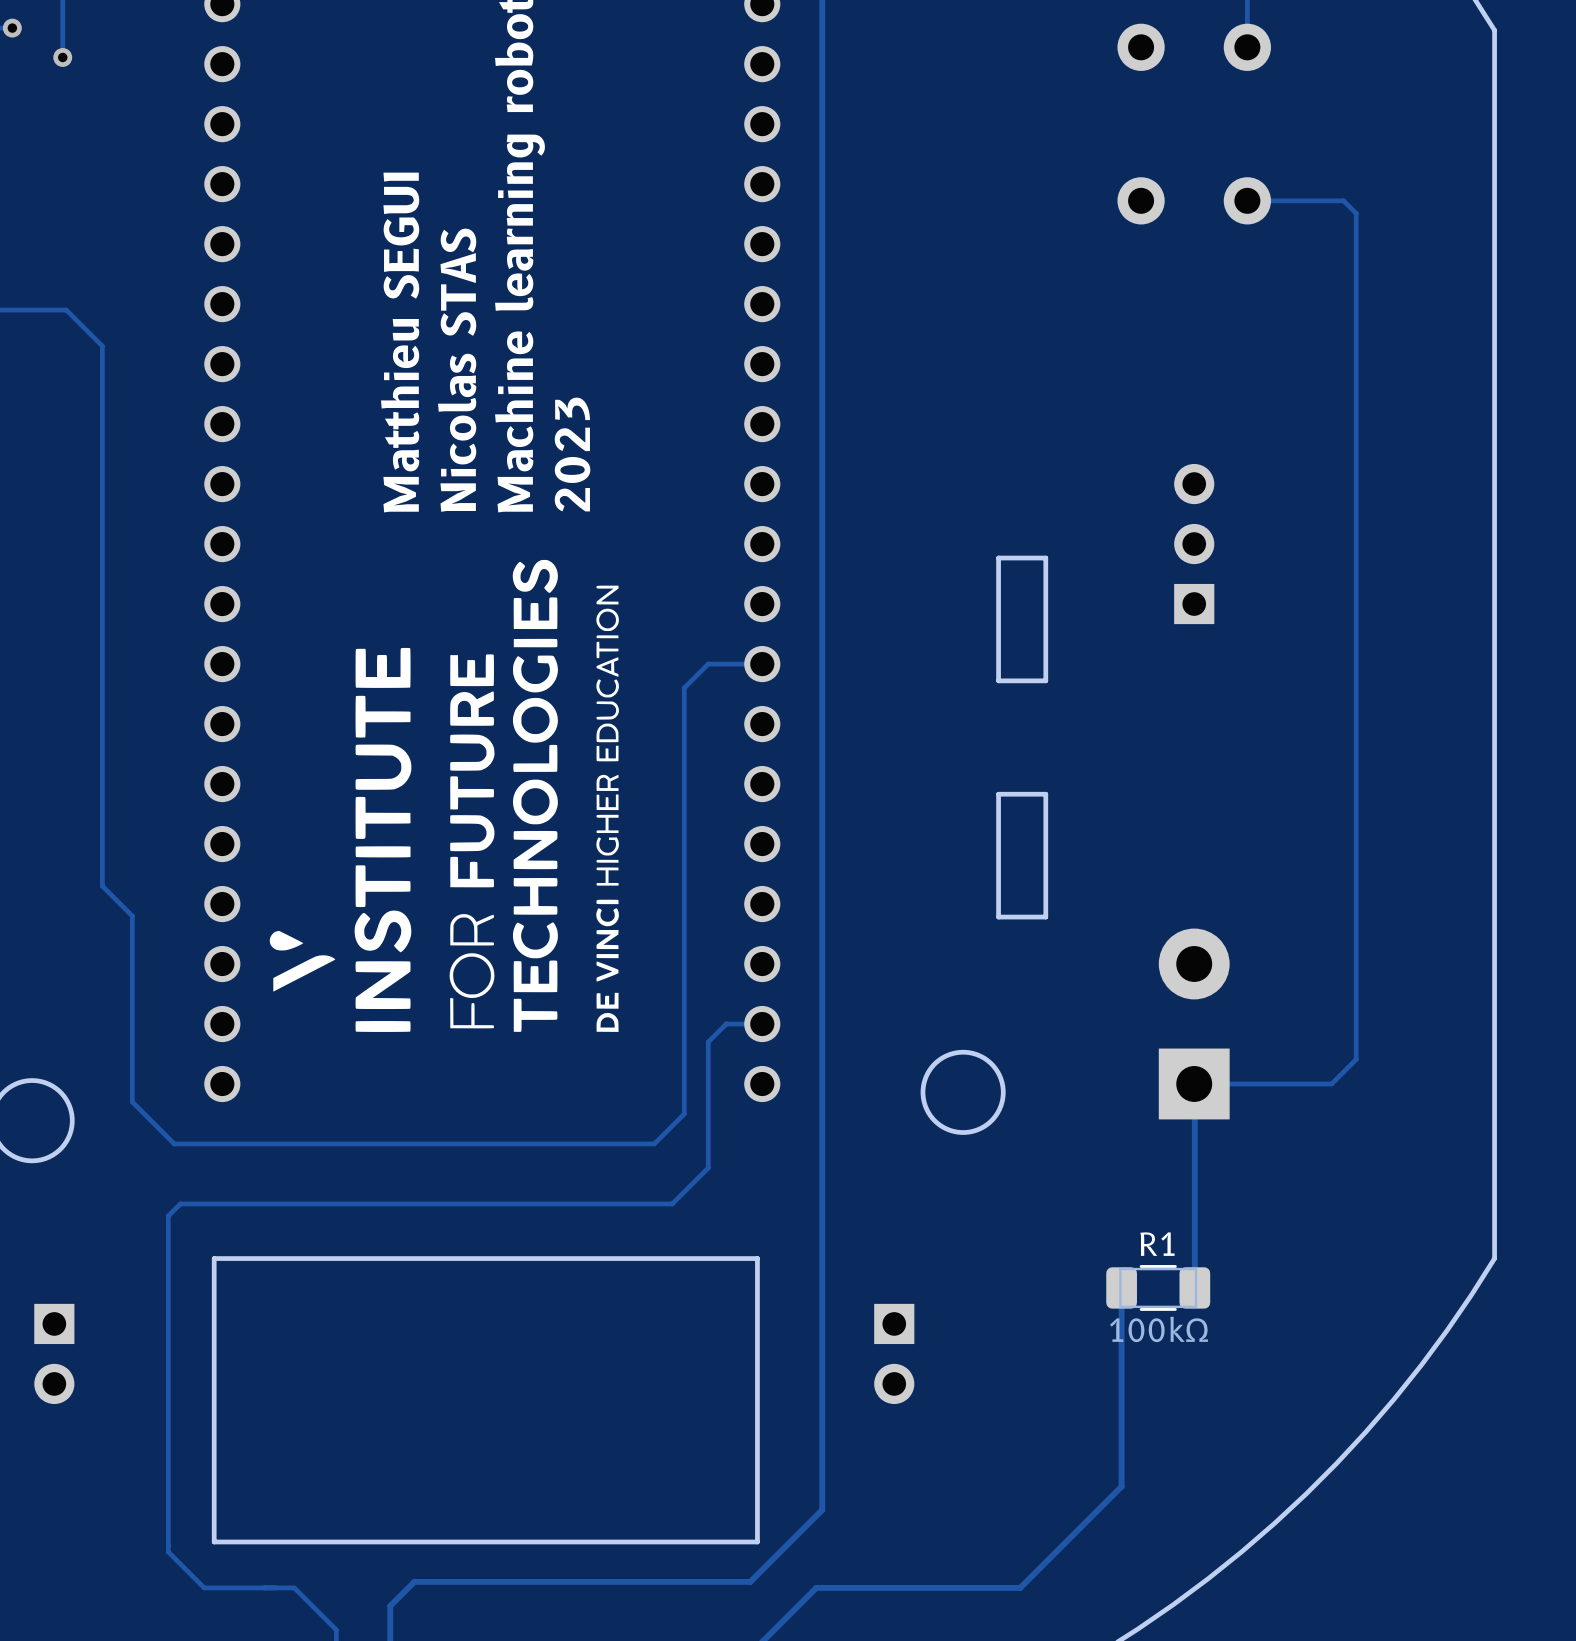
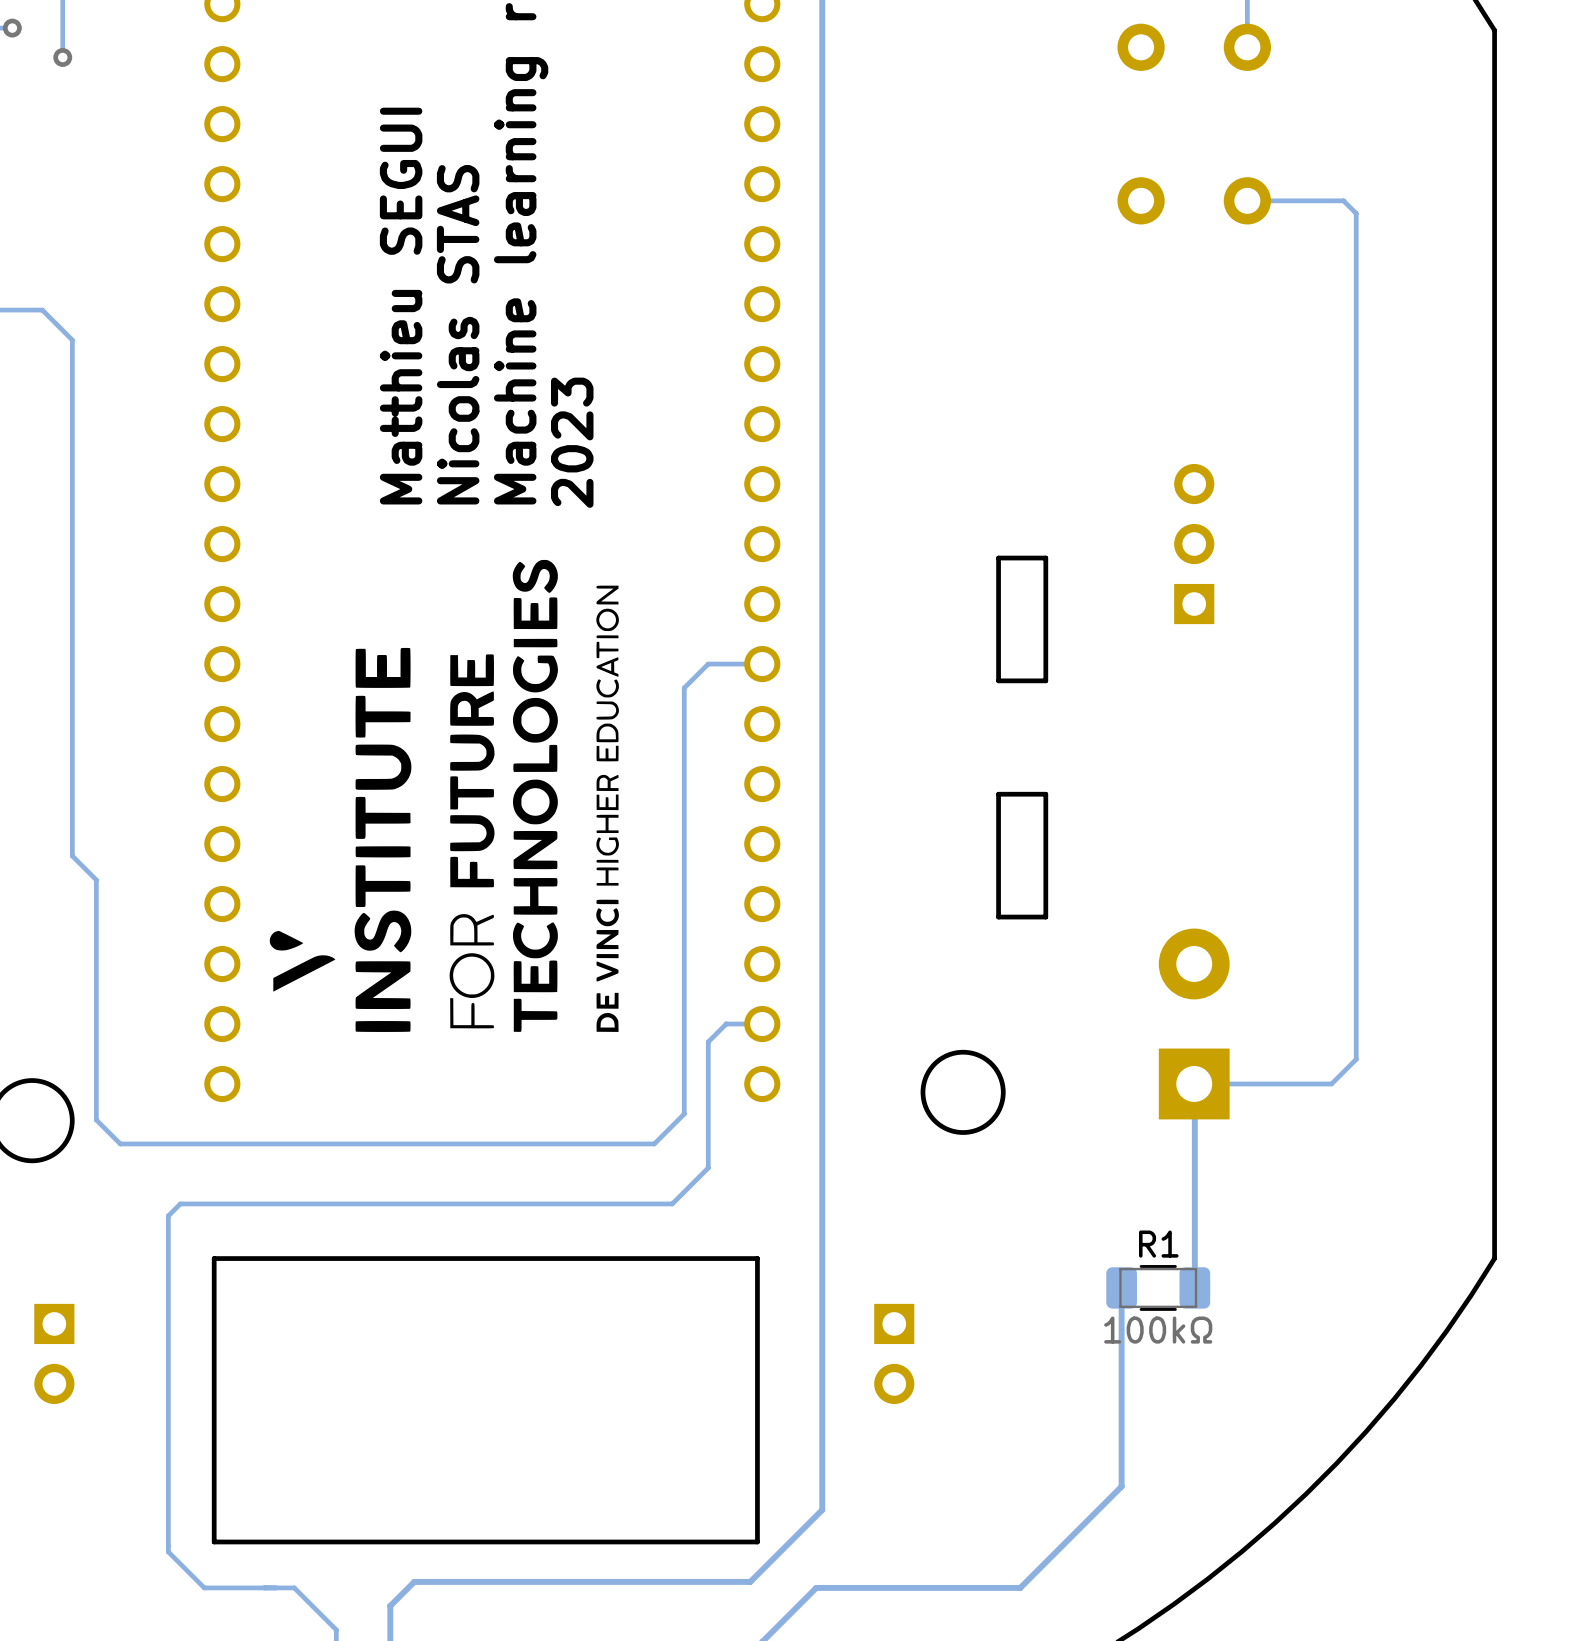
track: (42, 310) (66, 310) (102, 346) (102, 885) (132, 915) (132, 1101) (174, 1143) -> (42, 310) (72, 340) (72, 856) (96, 880) (96, 1119) (120, 1143) (174, 1143)

